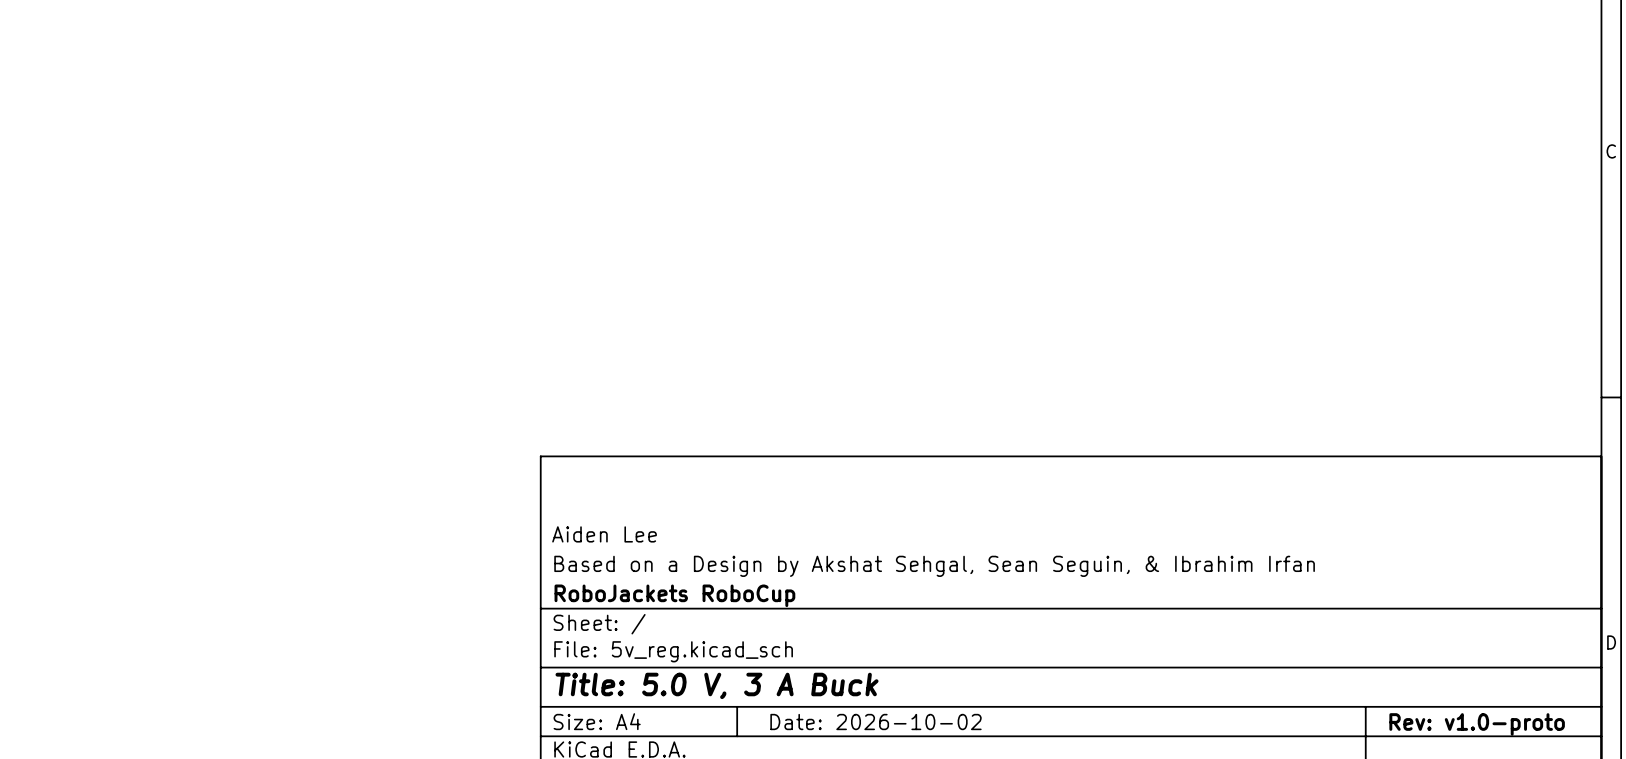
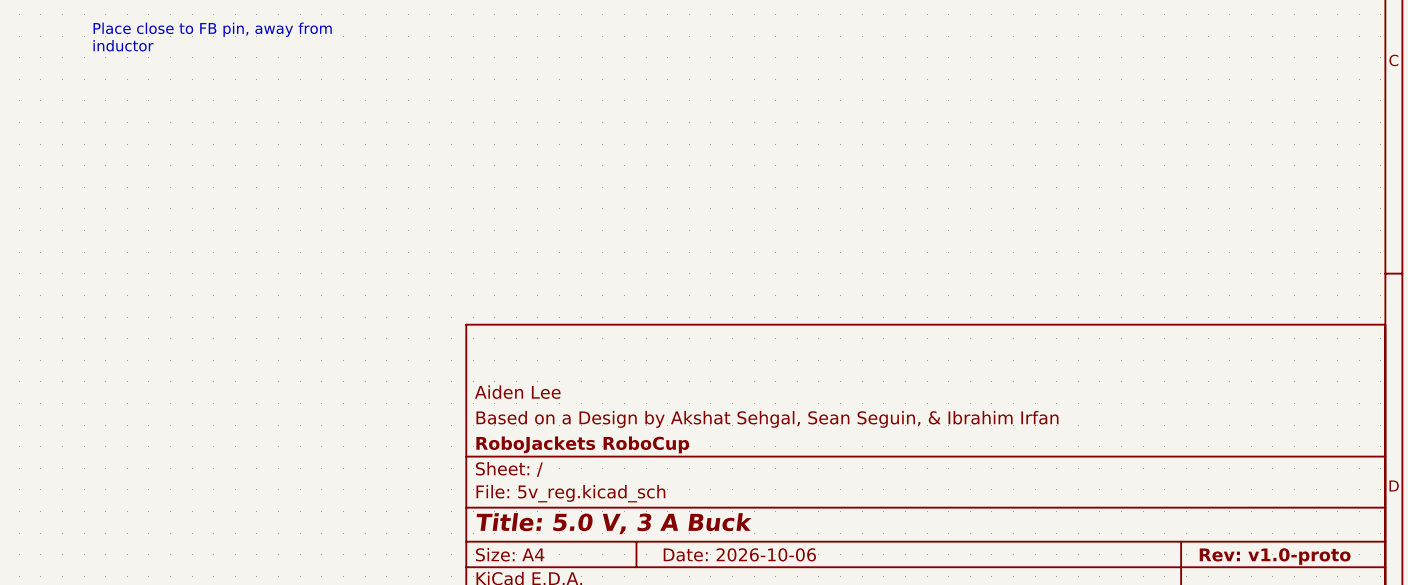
text: none -> Place close to FB pin, away from (212, 29)
text: none -> inductor (123, 45)
title block: Date: 2026-10-02 (876, 722) -> Date: 2026-10-06 (739, 554)

